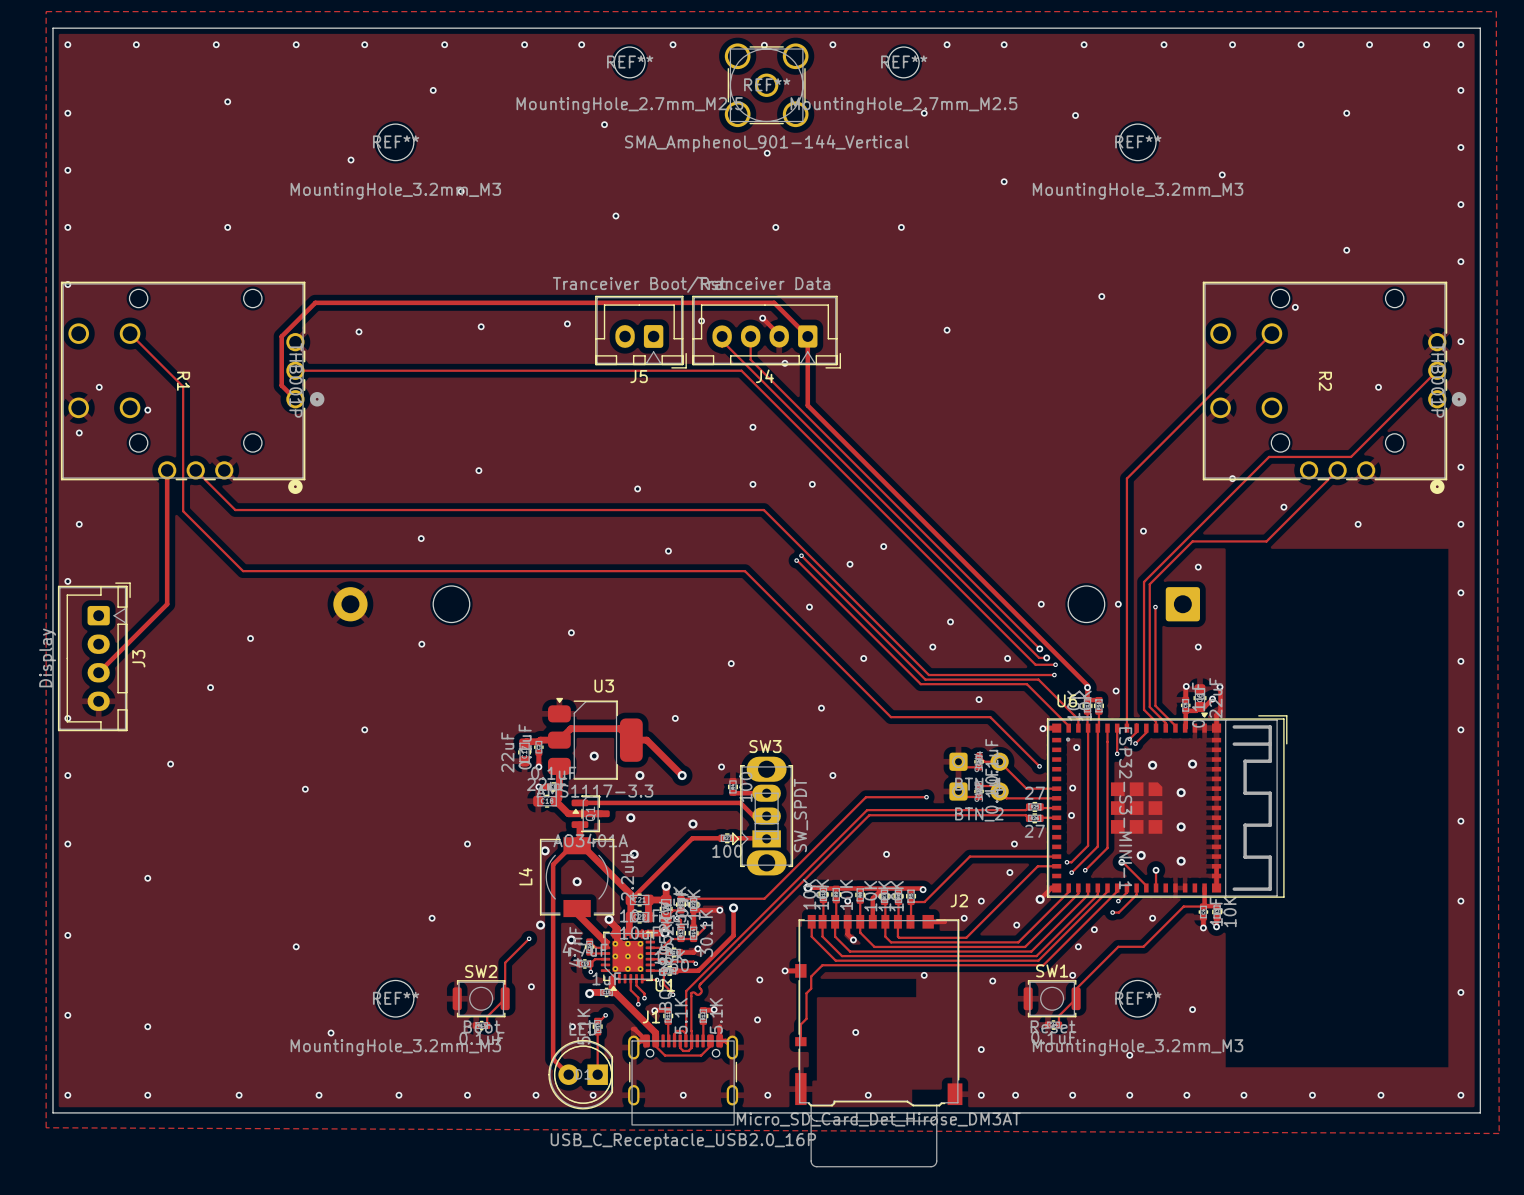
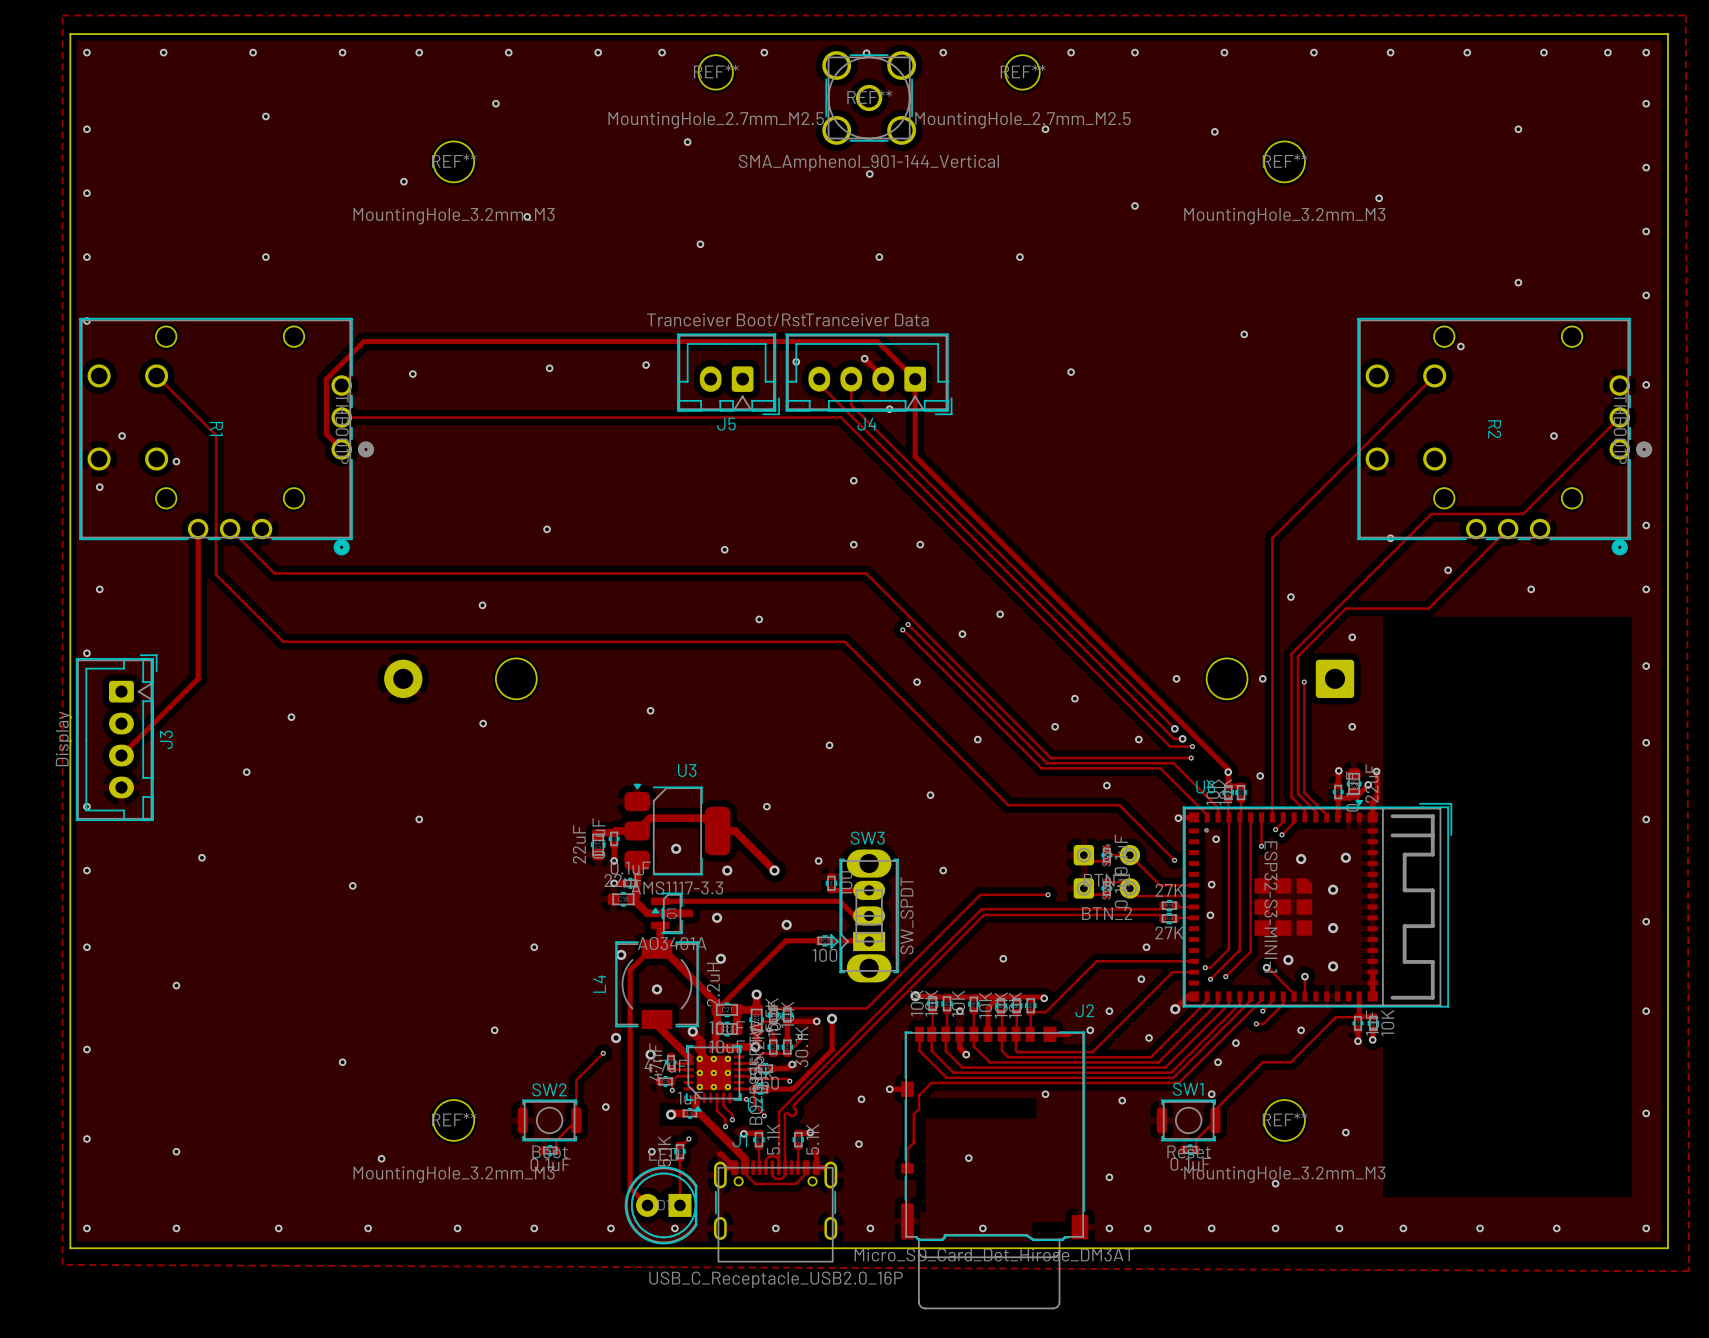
part value: 27 (1034, 793) -> 27K (1169, 890)
part value: 27 (1034, 831) -> 27K (1169, 932)

